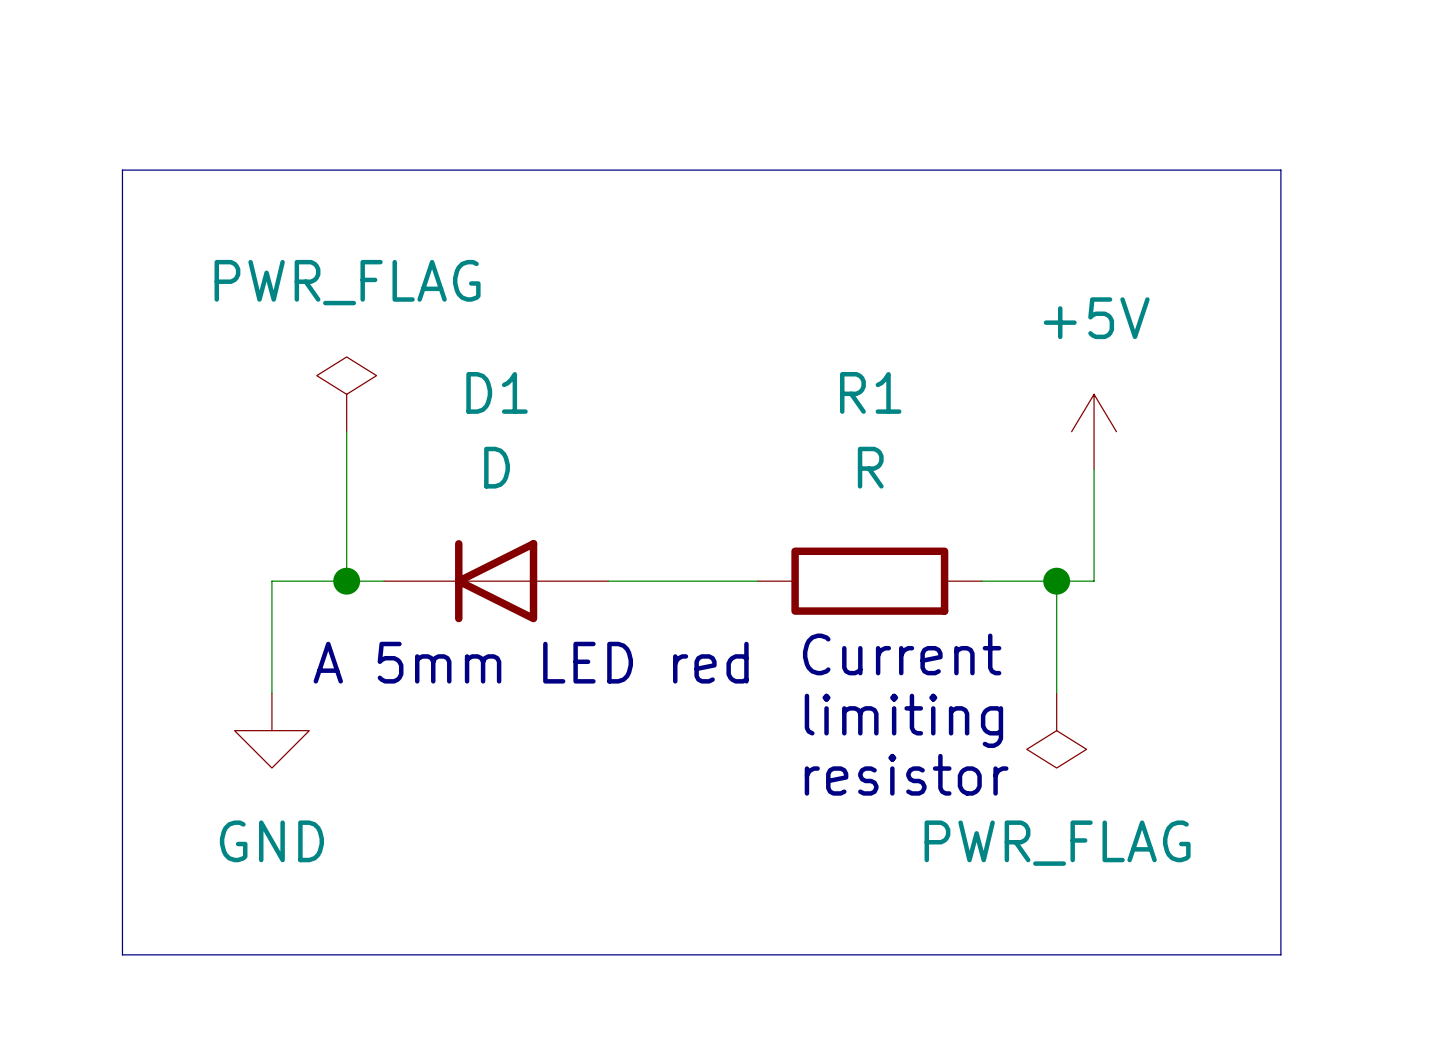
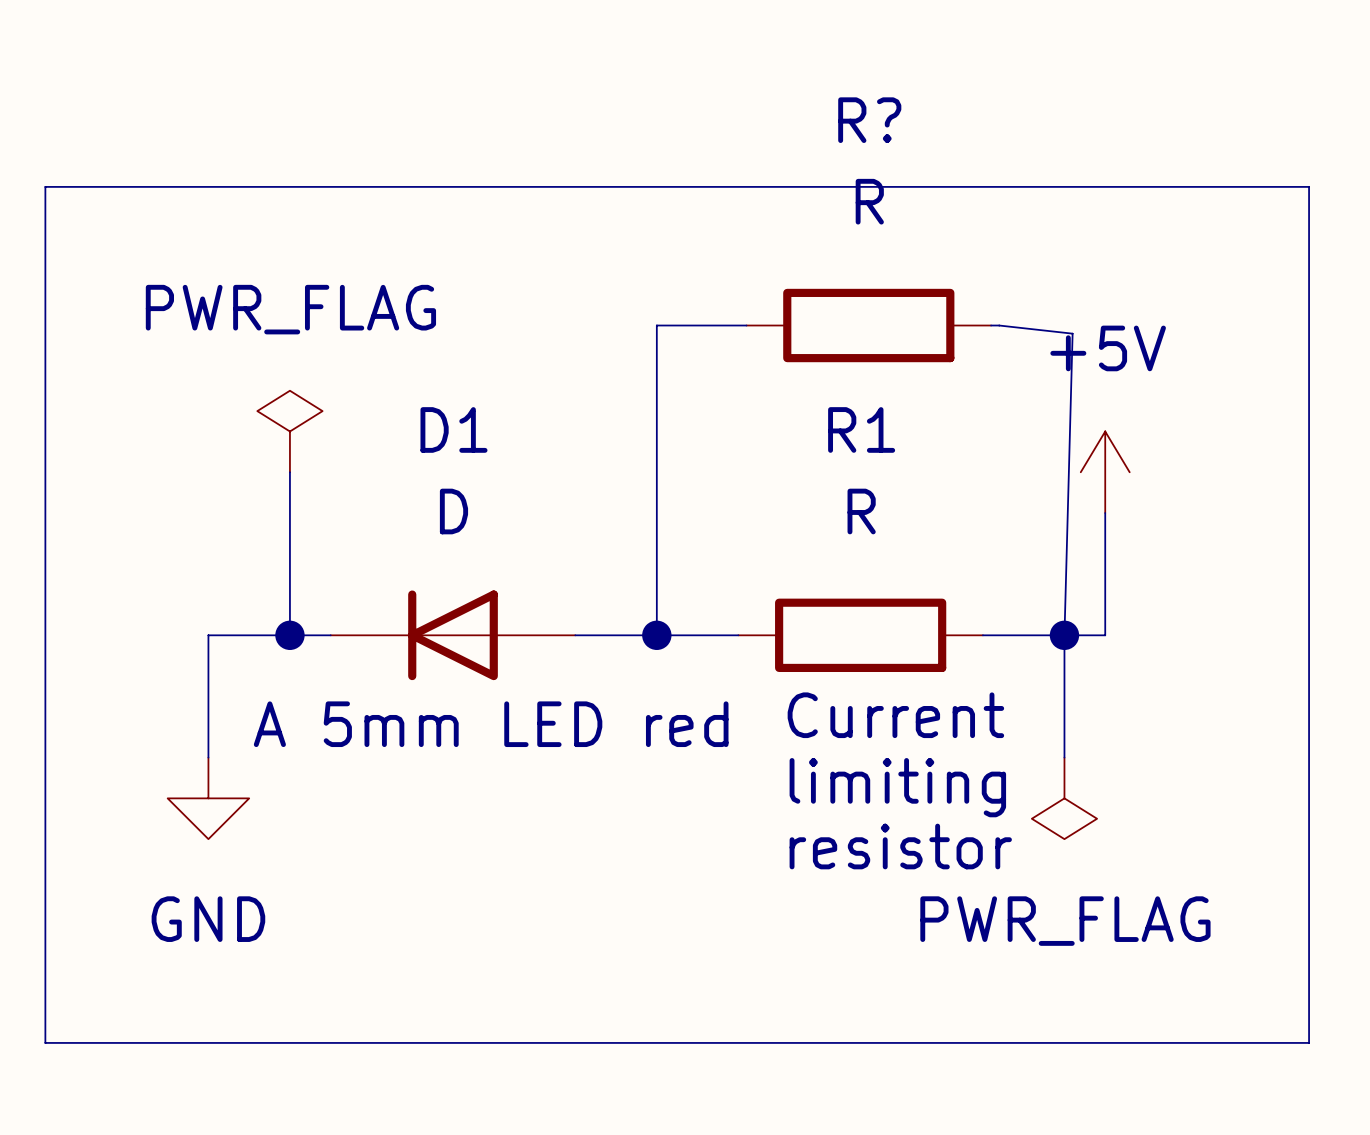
wire: none -> (746, 325) (656, 325) (656, 635)
R?: none -> R (868, 325)
wire: none -> (991, 325) (1072, 333) (1064, 635)
junction: none -> (656, 635)

